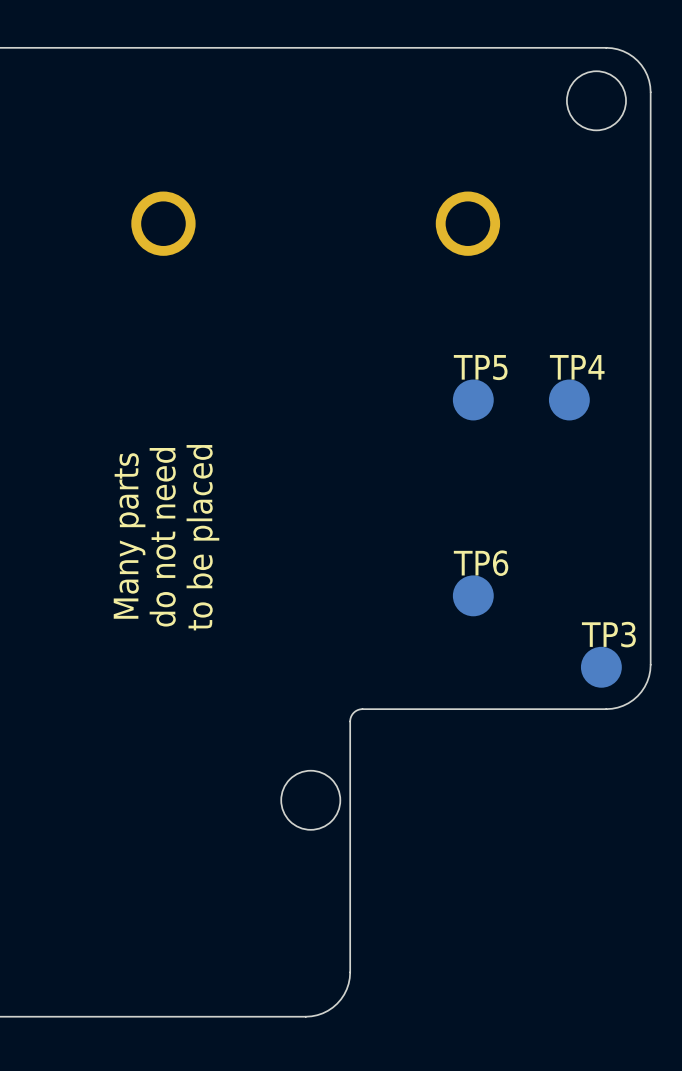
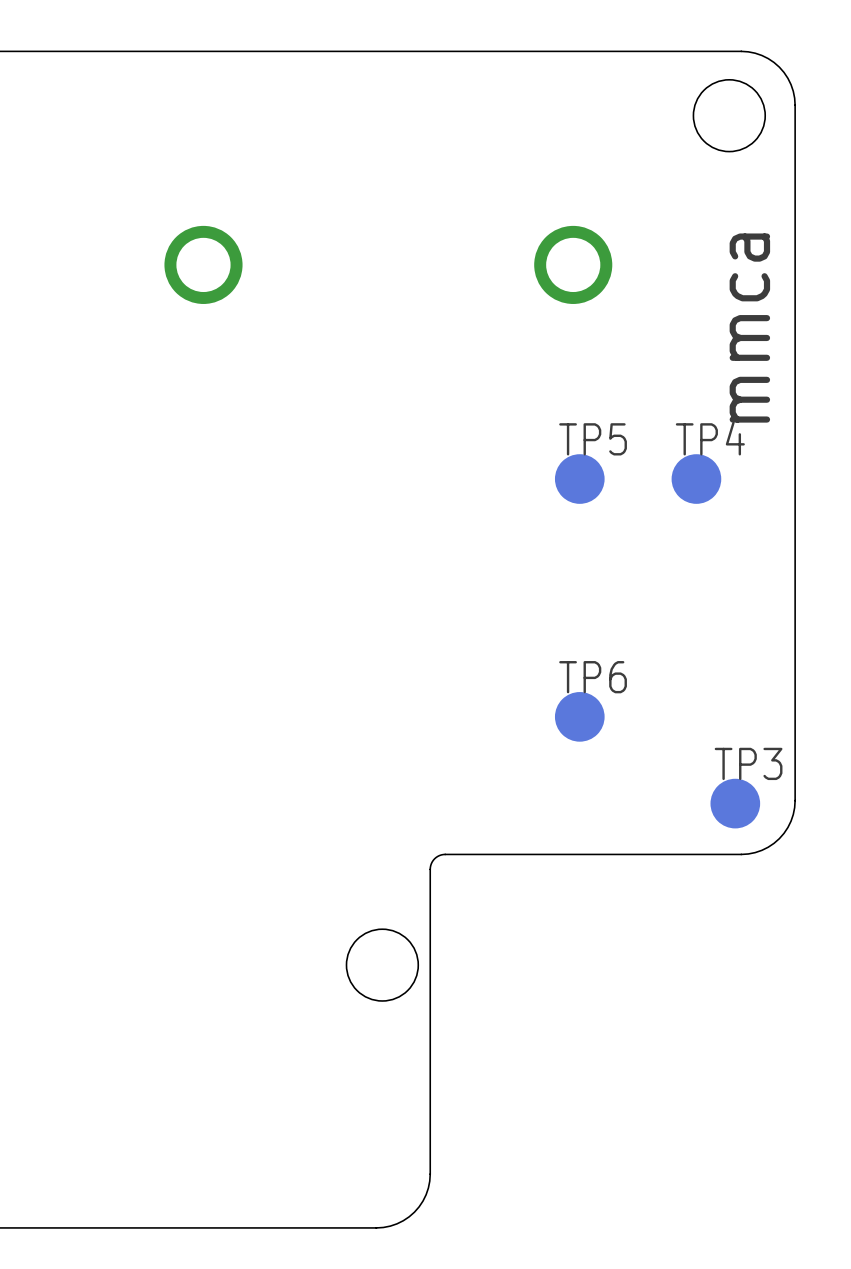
text: none -> mmca (749, 328)
text: Many parts (129, 535) -> none
text: do not need (162, 537) -> none
text: to be placed (202, 537) -> none

